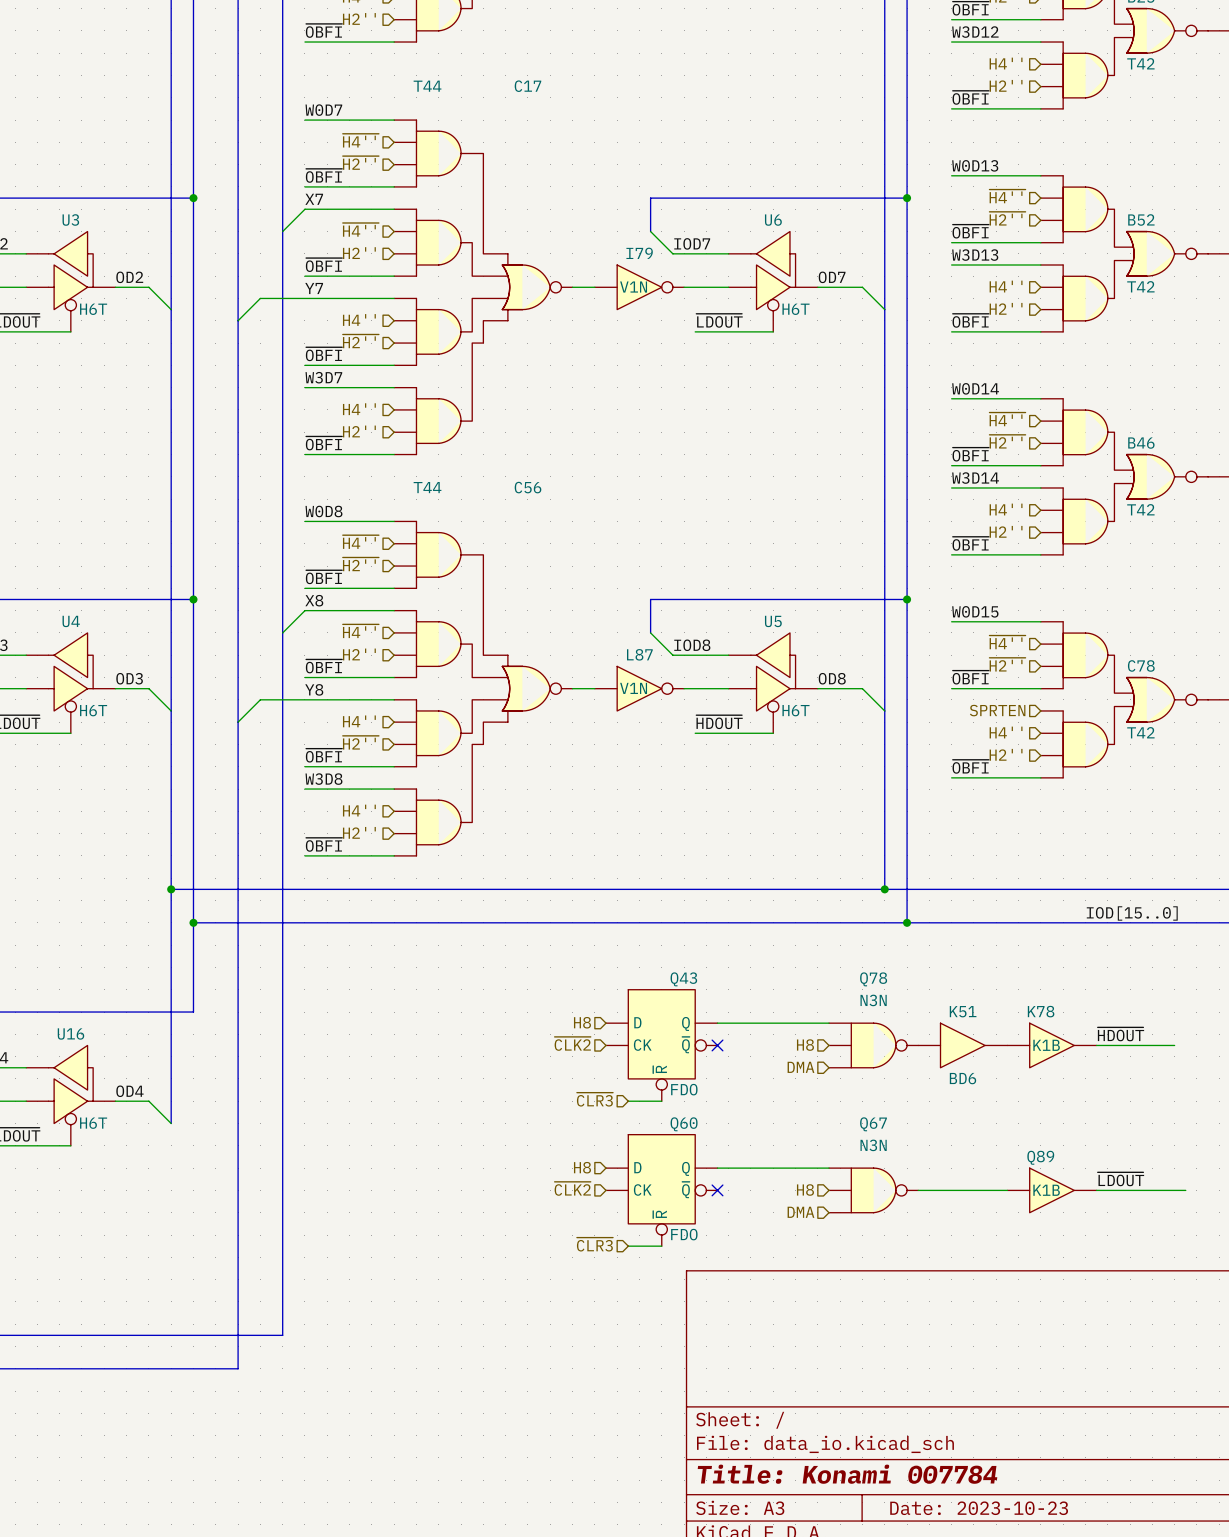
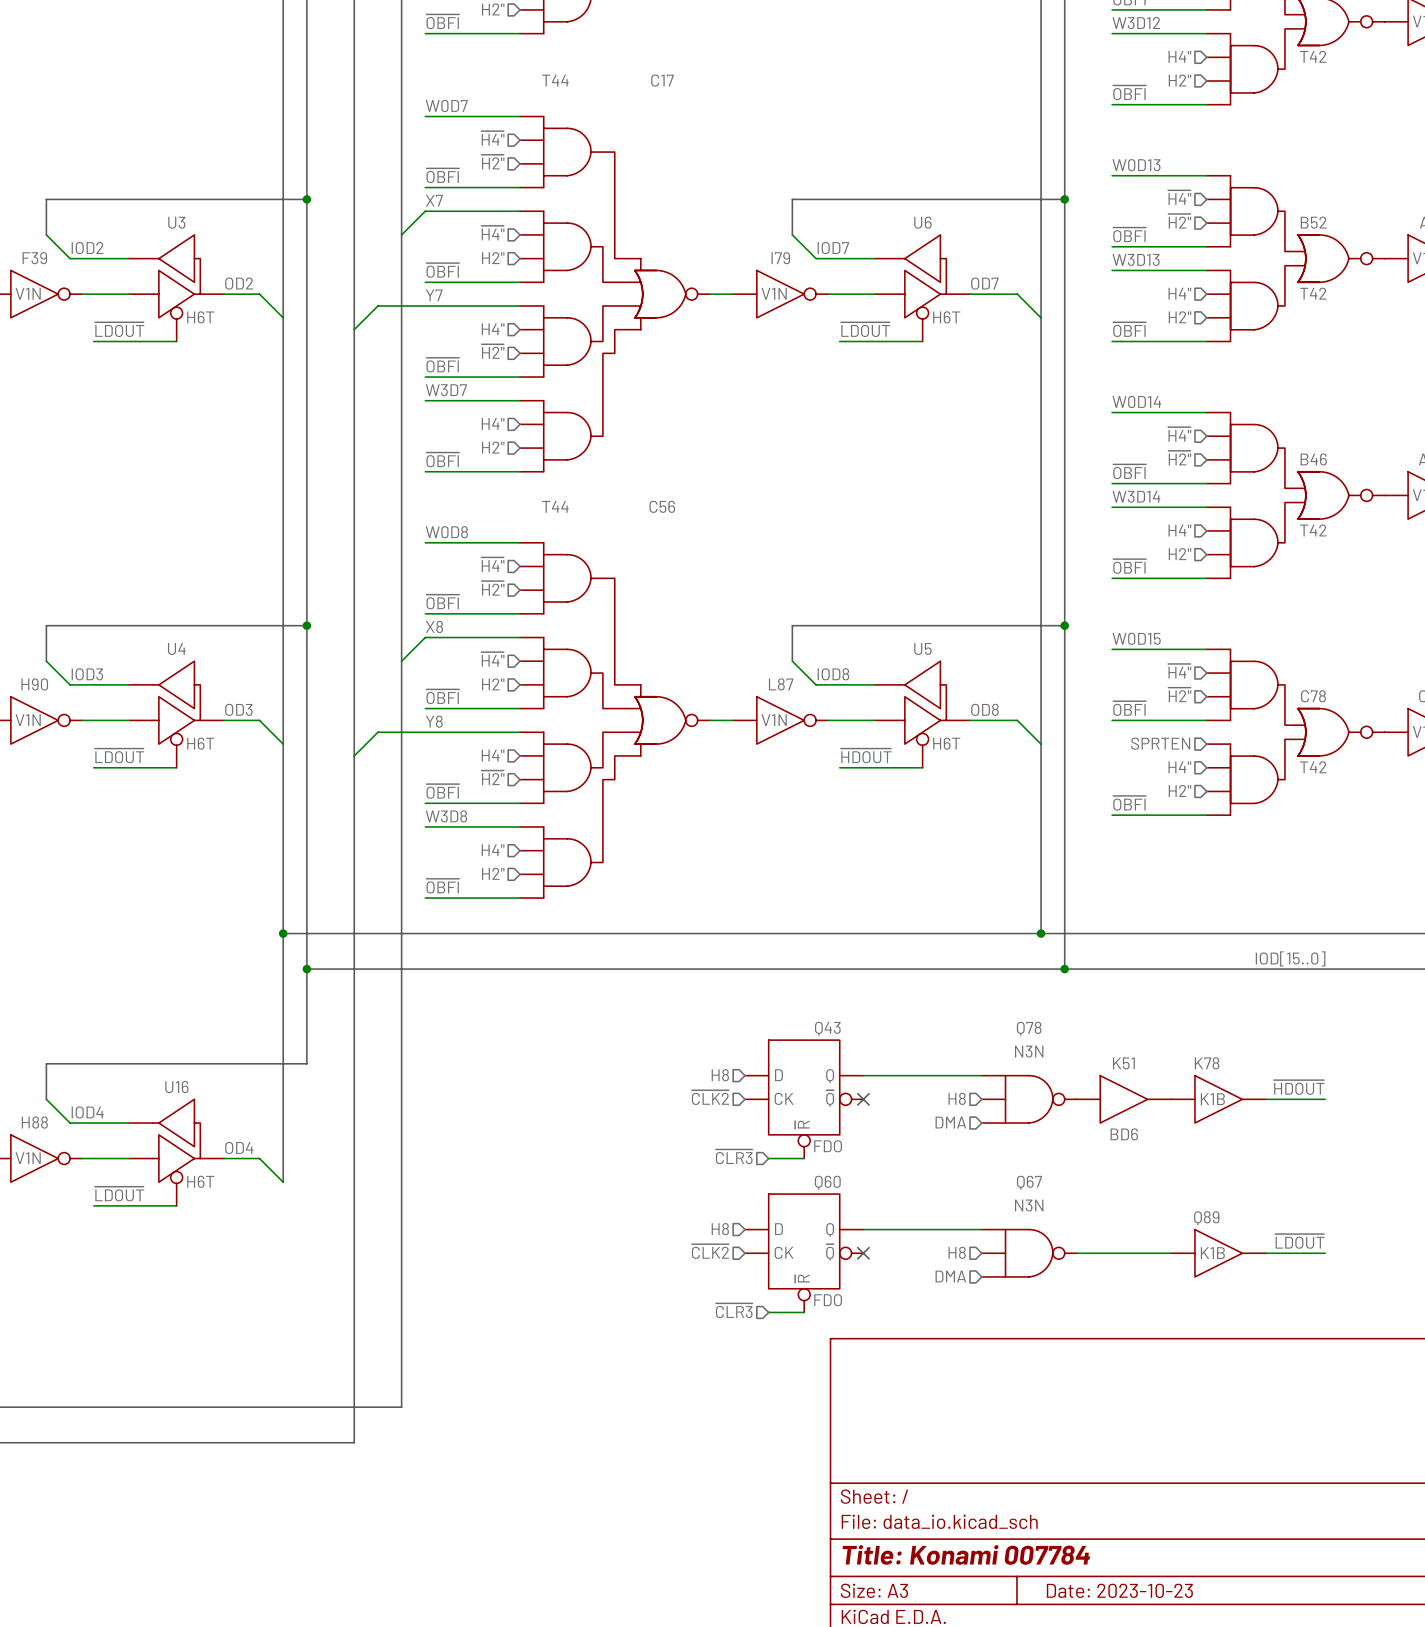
label position: ~{HDOUT} (1120, 1034) -> ~{HDOUT} (1299, 1087)
wire: (1152, 1045) (1174, 1045) -> none
label position: ~{LDOUT} (1120, 1179) -> ~{LDOUT} (1299, 1241)
wire: (1152, 1190) (1185, 1190) -> none

